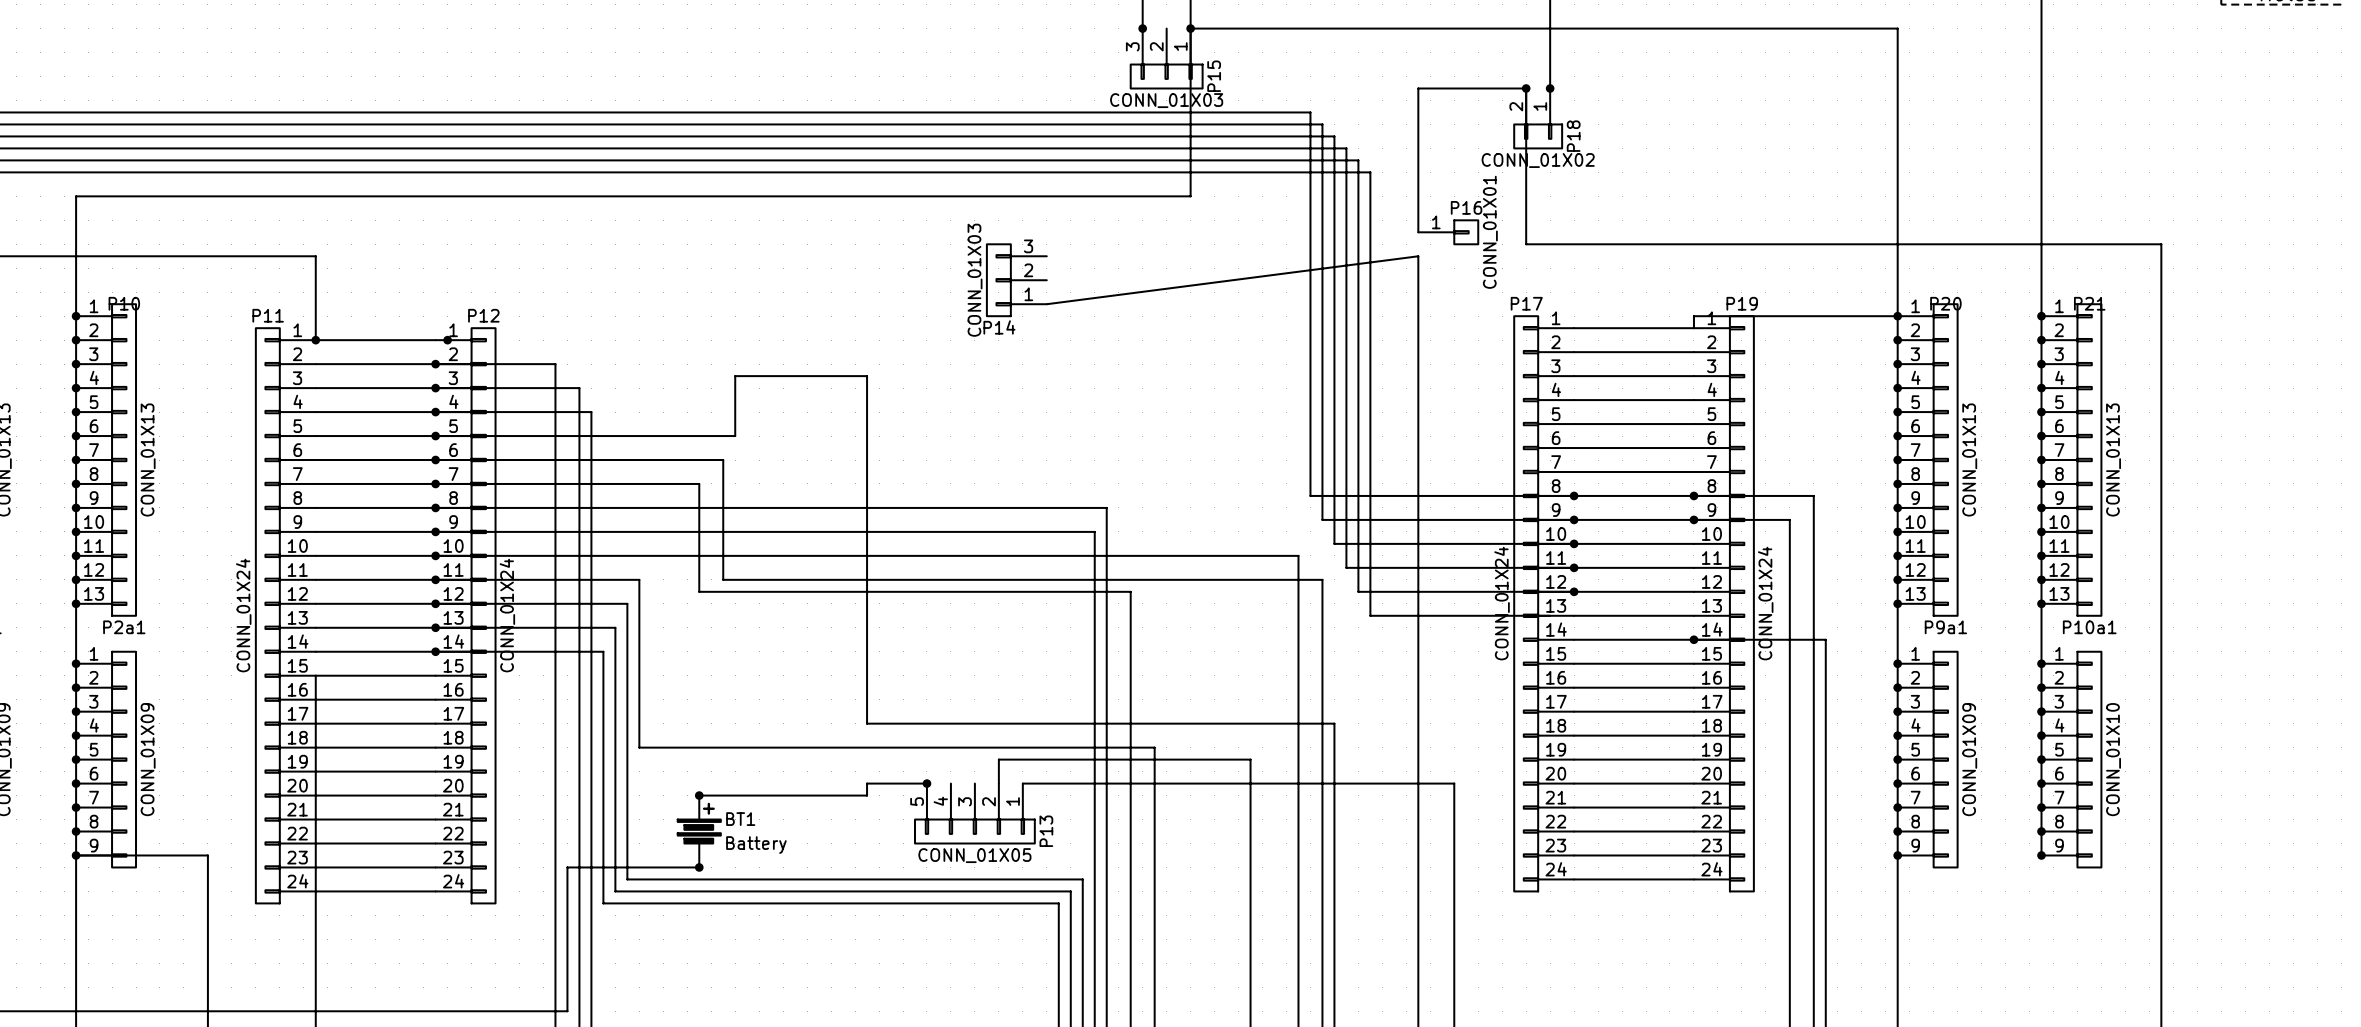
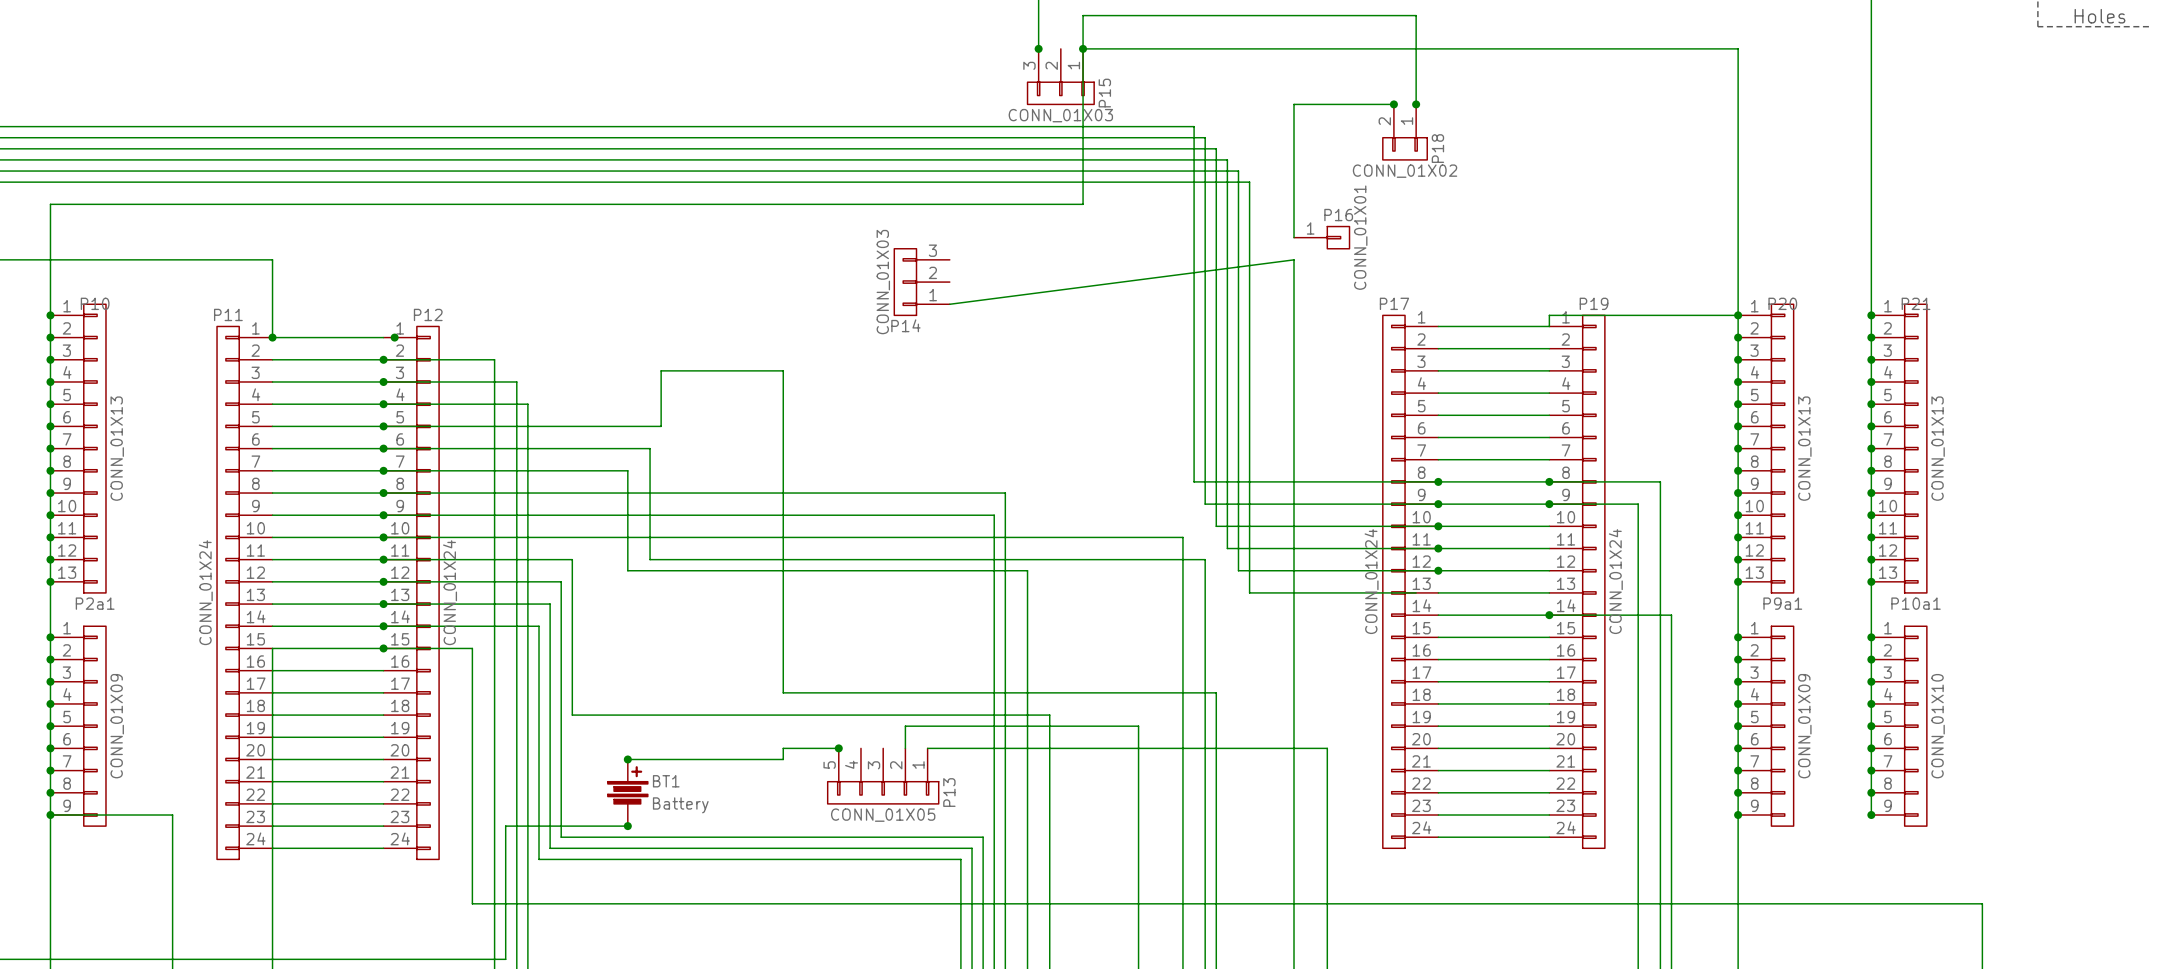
wire: (1526, 88) (1526, 244) (2161, 244) (2161, 951) -> (383, 648) (472, 648) (472, 903) (1982, 903)
junction: none -> (383, 648)

